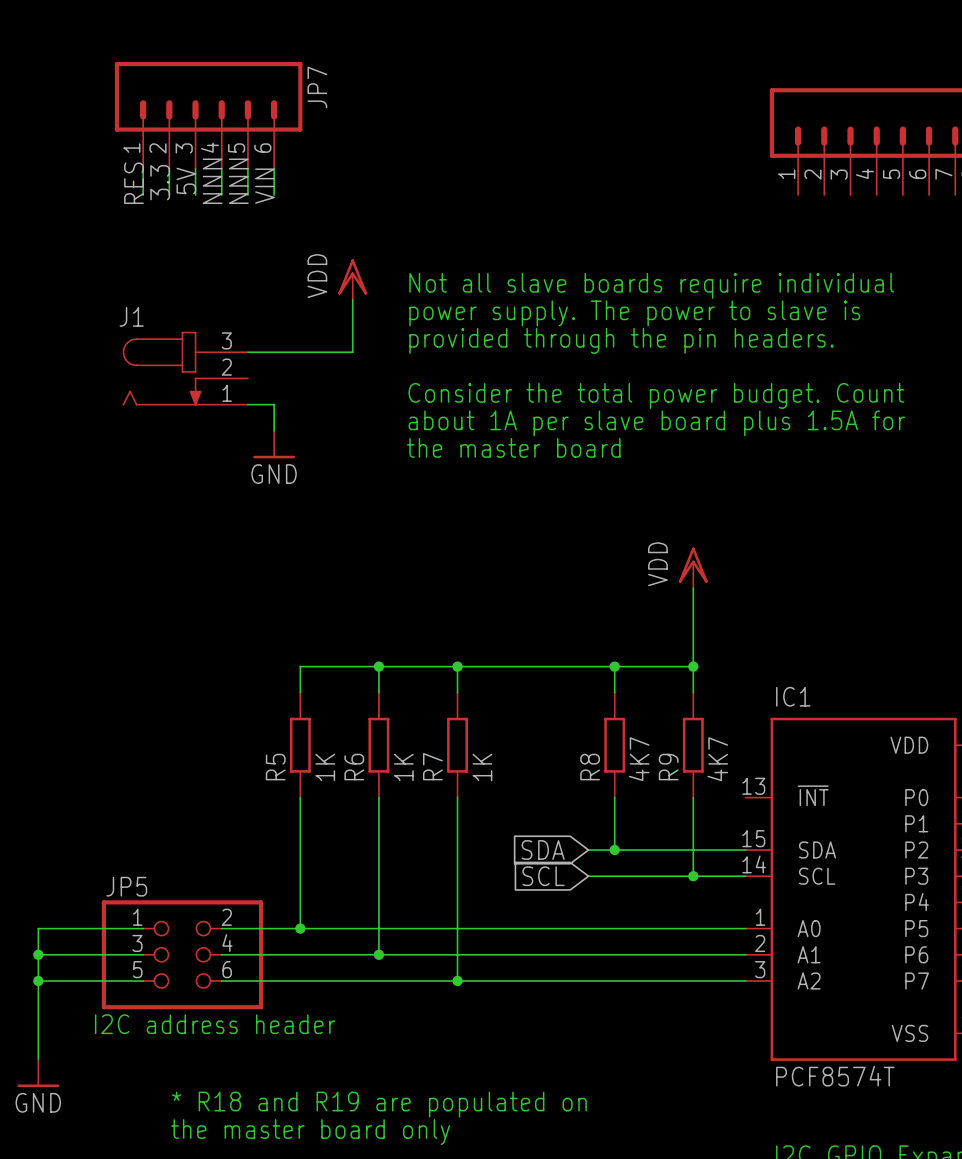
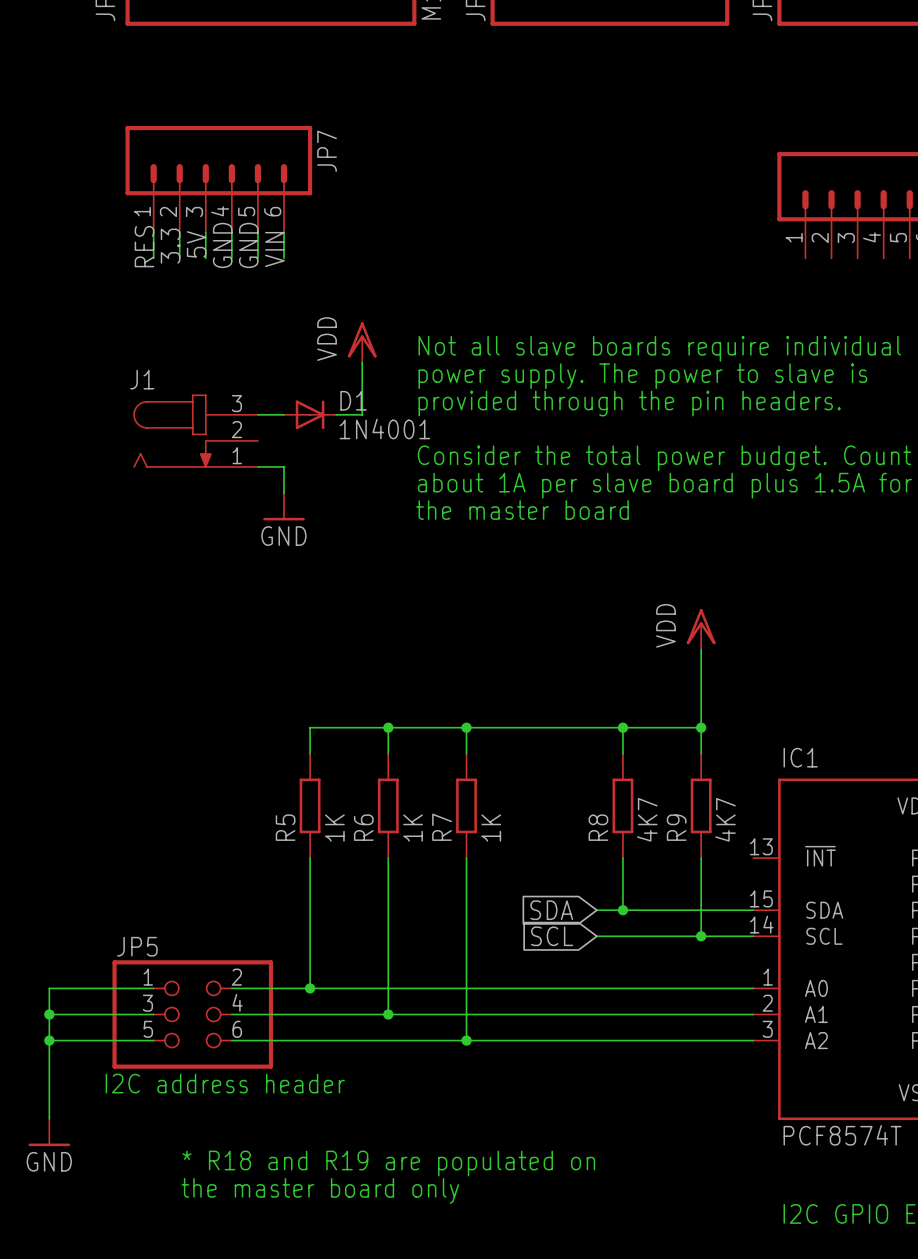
label: NNN (212, 181) -> GND (222, 245)
label: NNN (238, 181) -> GND (248, 245)
D1: none -> 1N4001 (310, 414)

